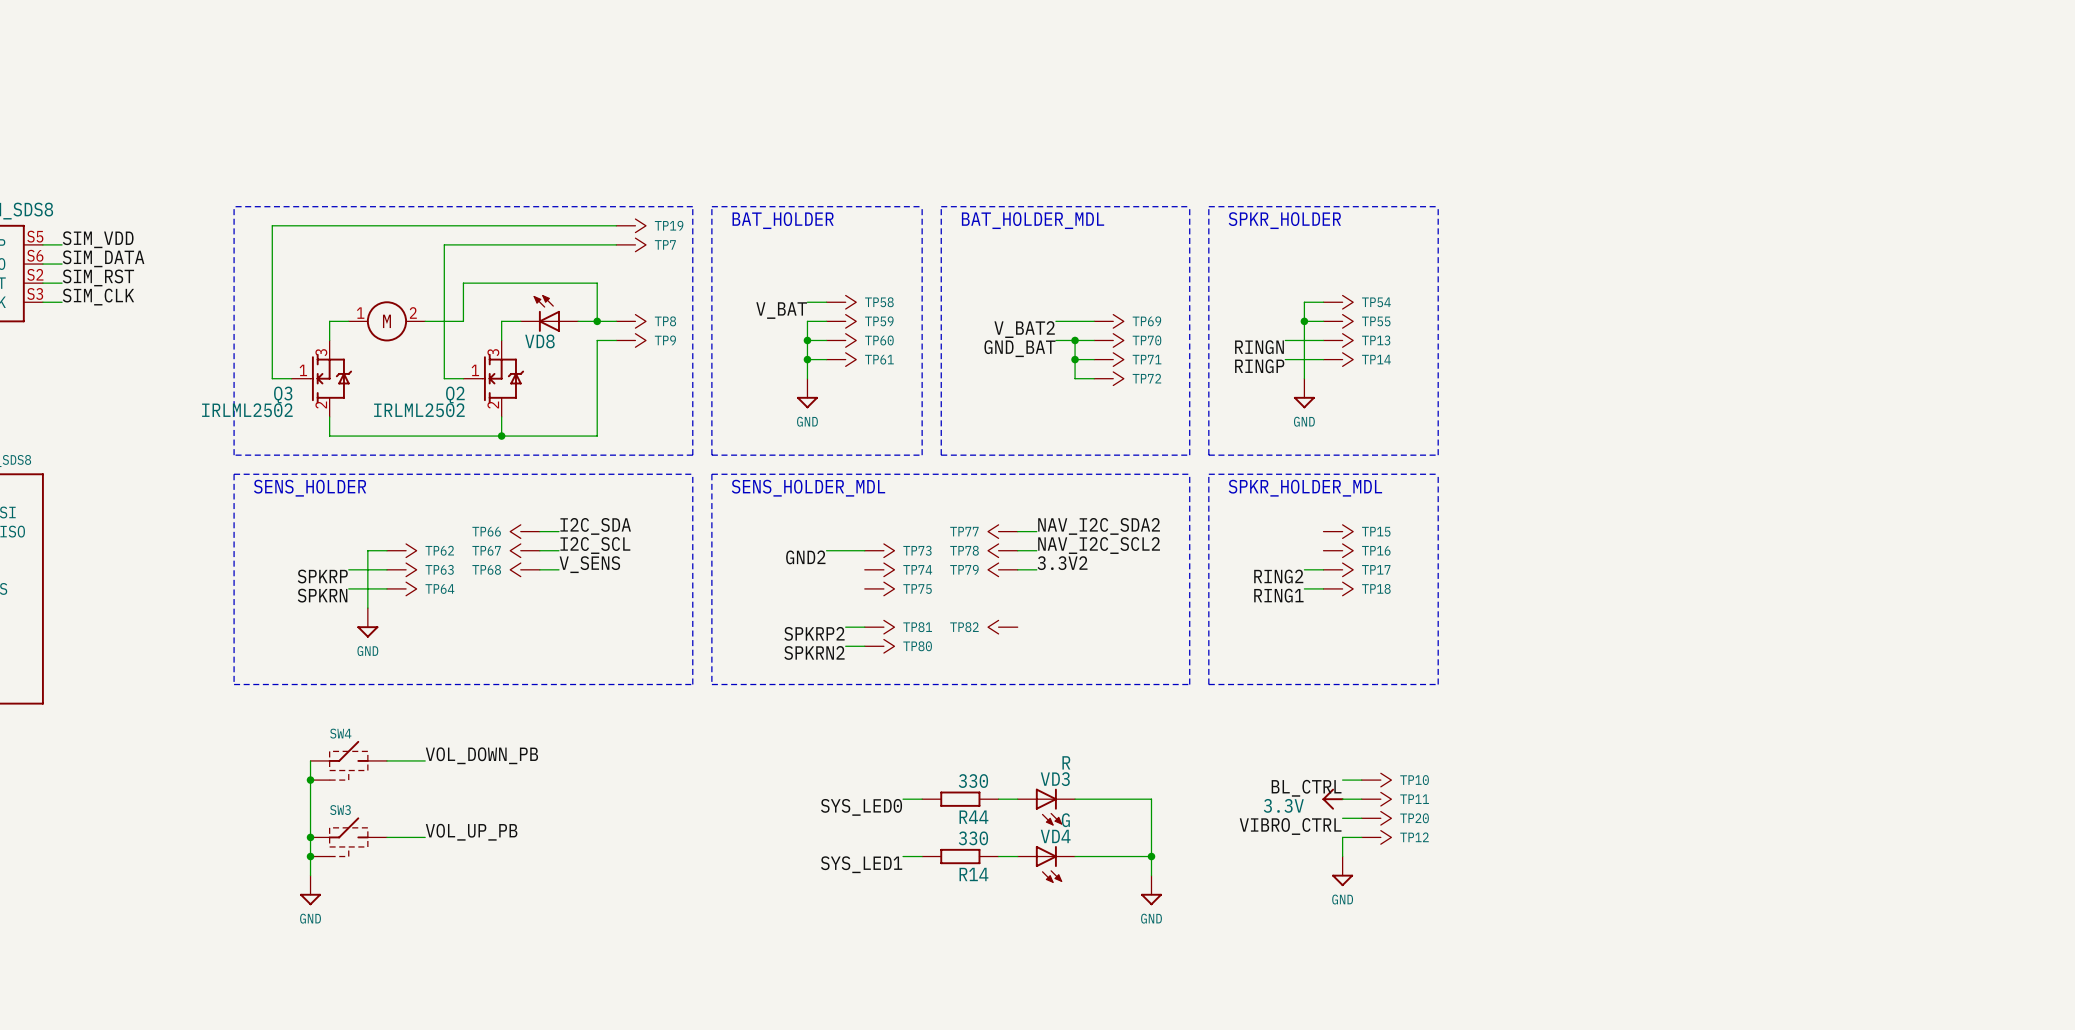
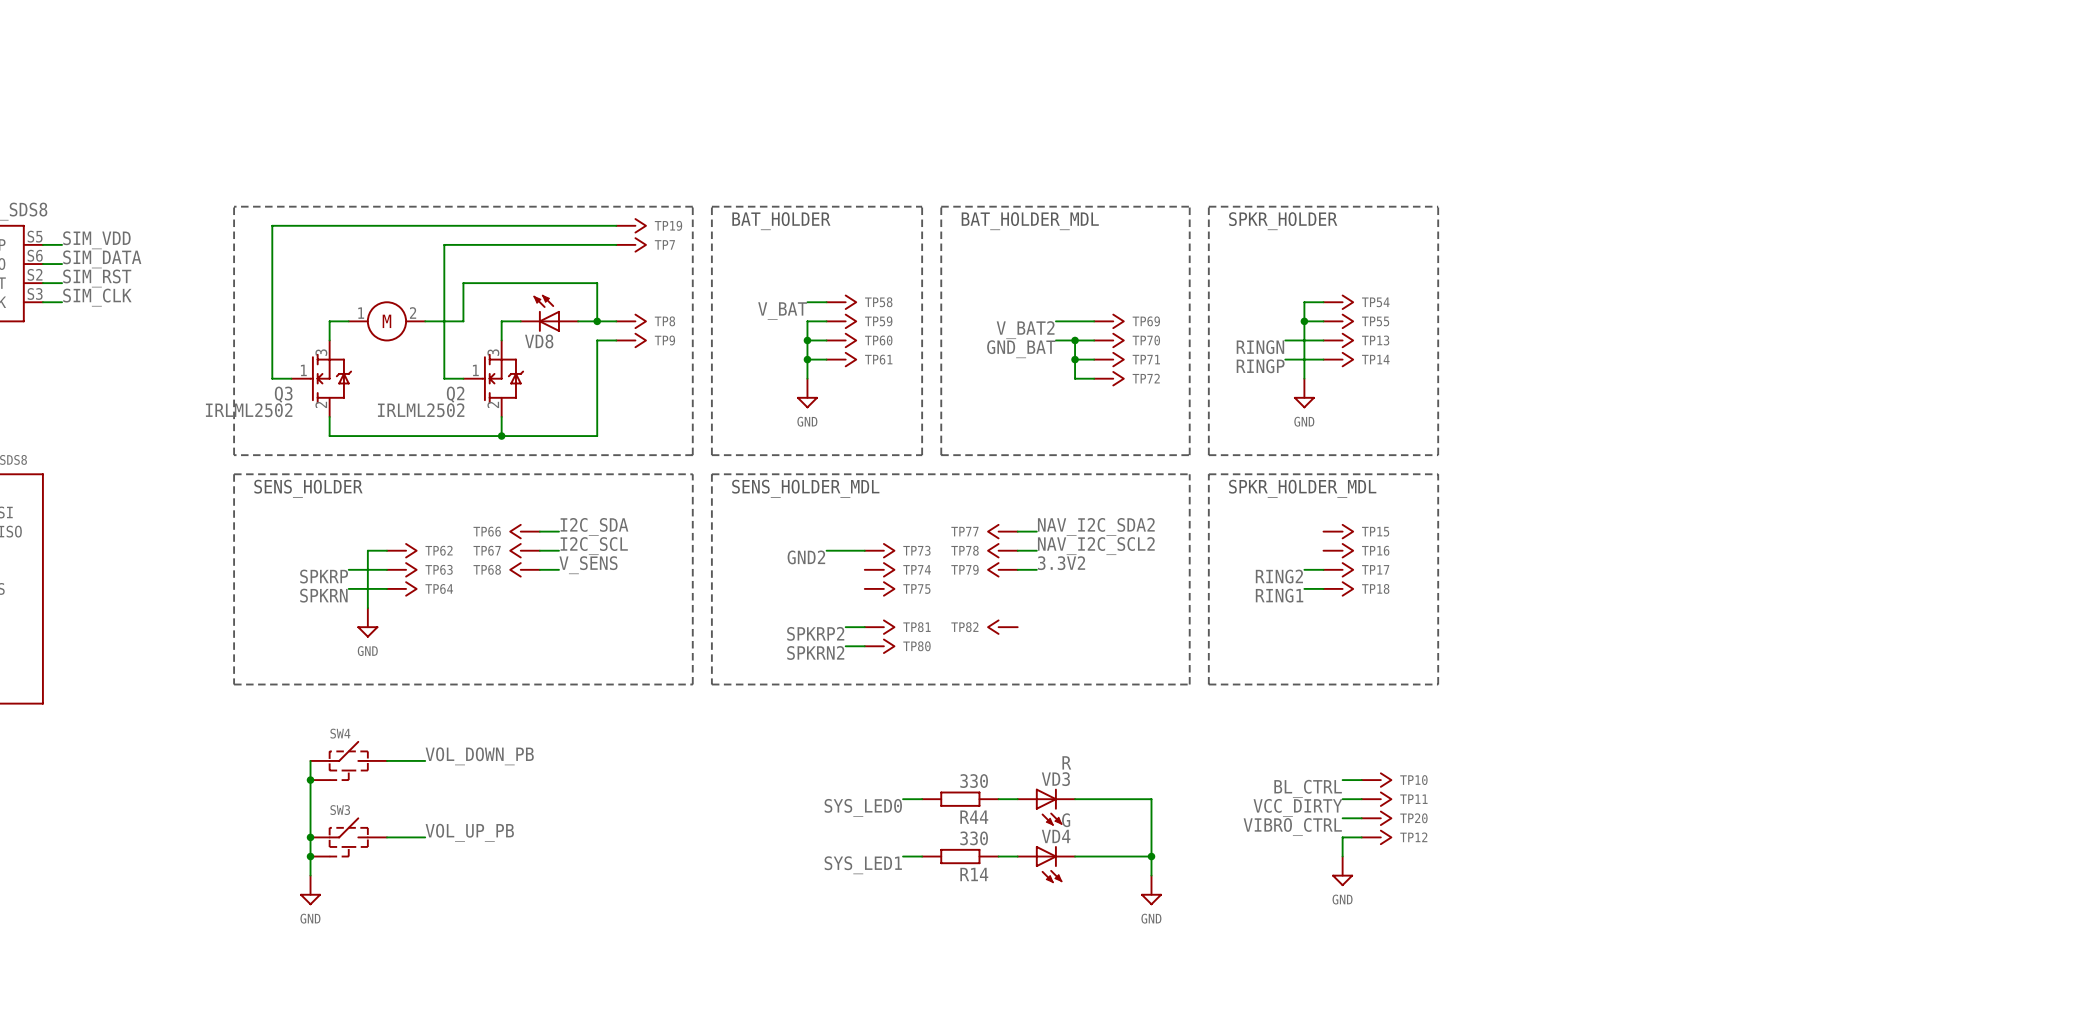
power symbol: 3.3V (1333, 799) -> none
label: none -> VCC_DIRTY (1297, 807)

